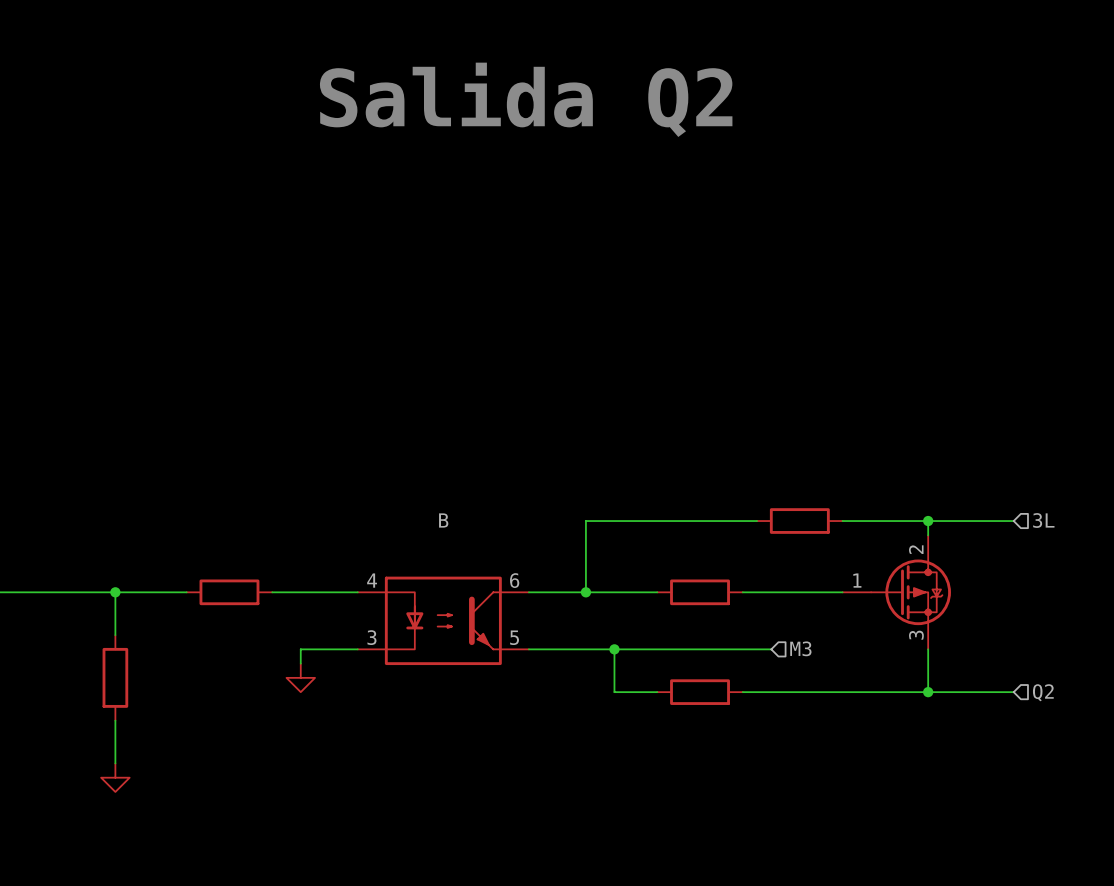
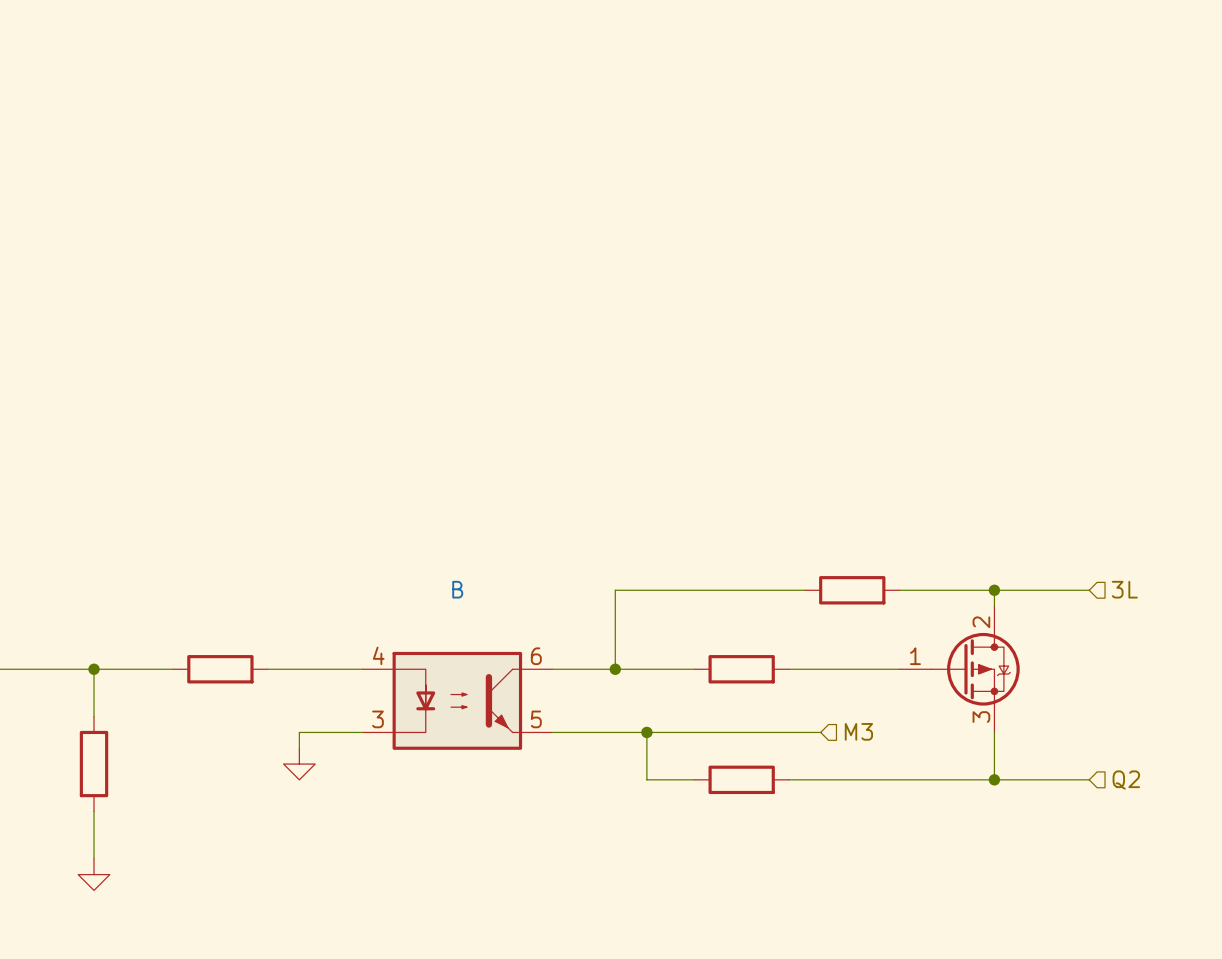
text: Salida Q2 (526, 99) -> none

